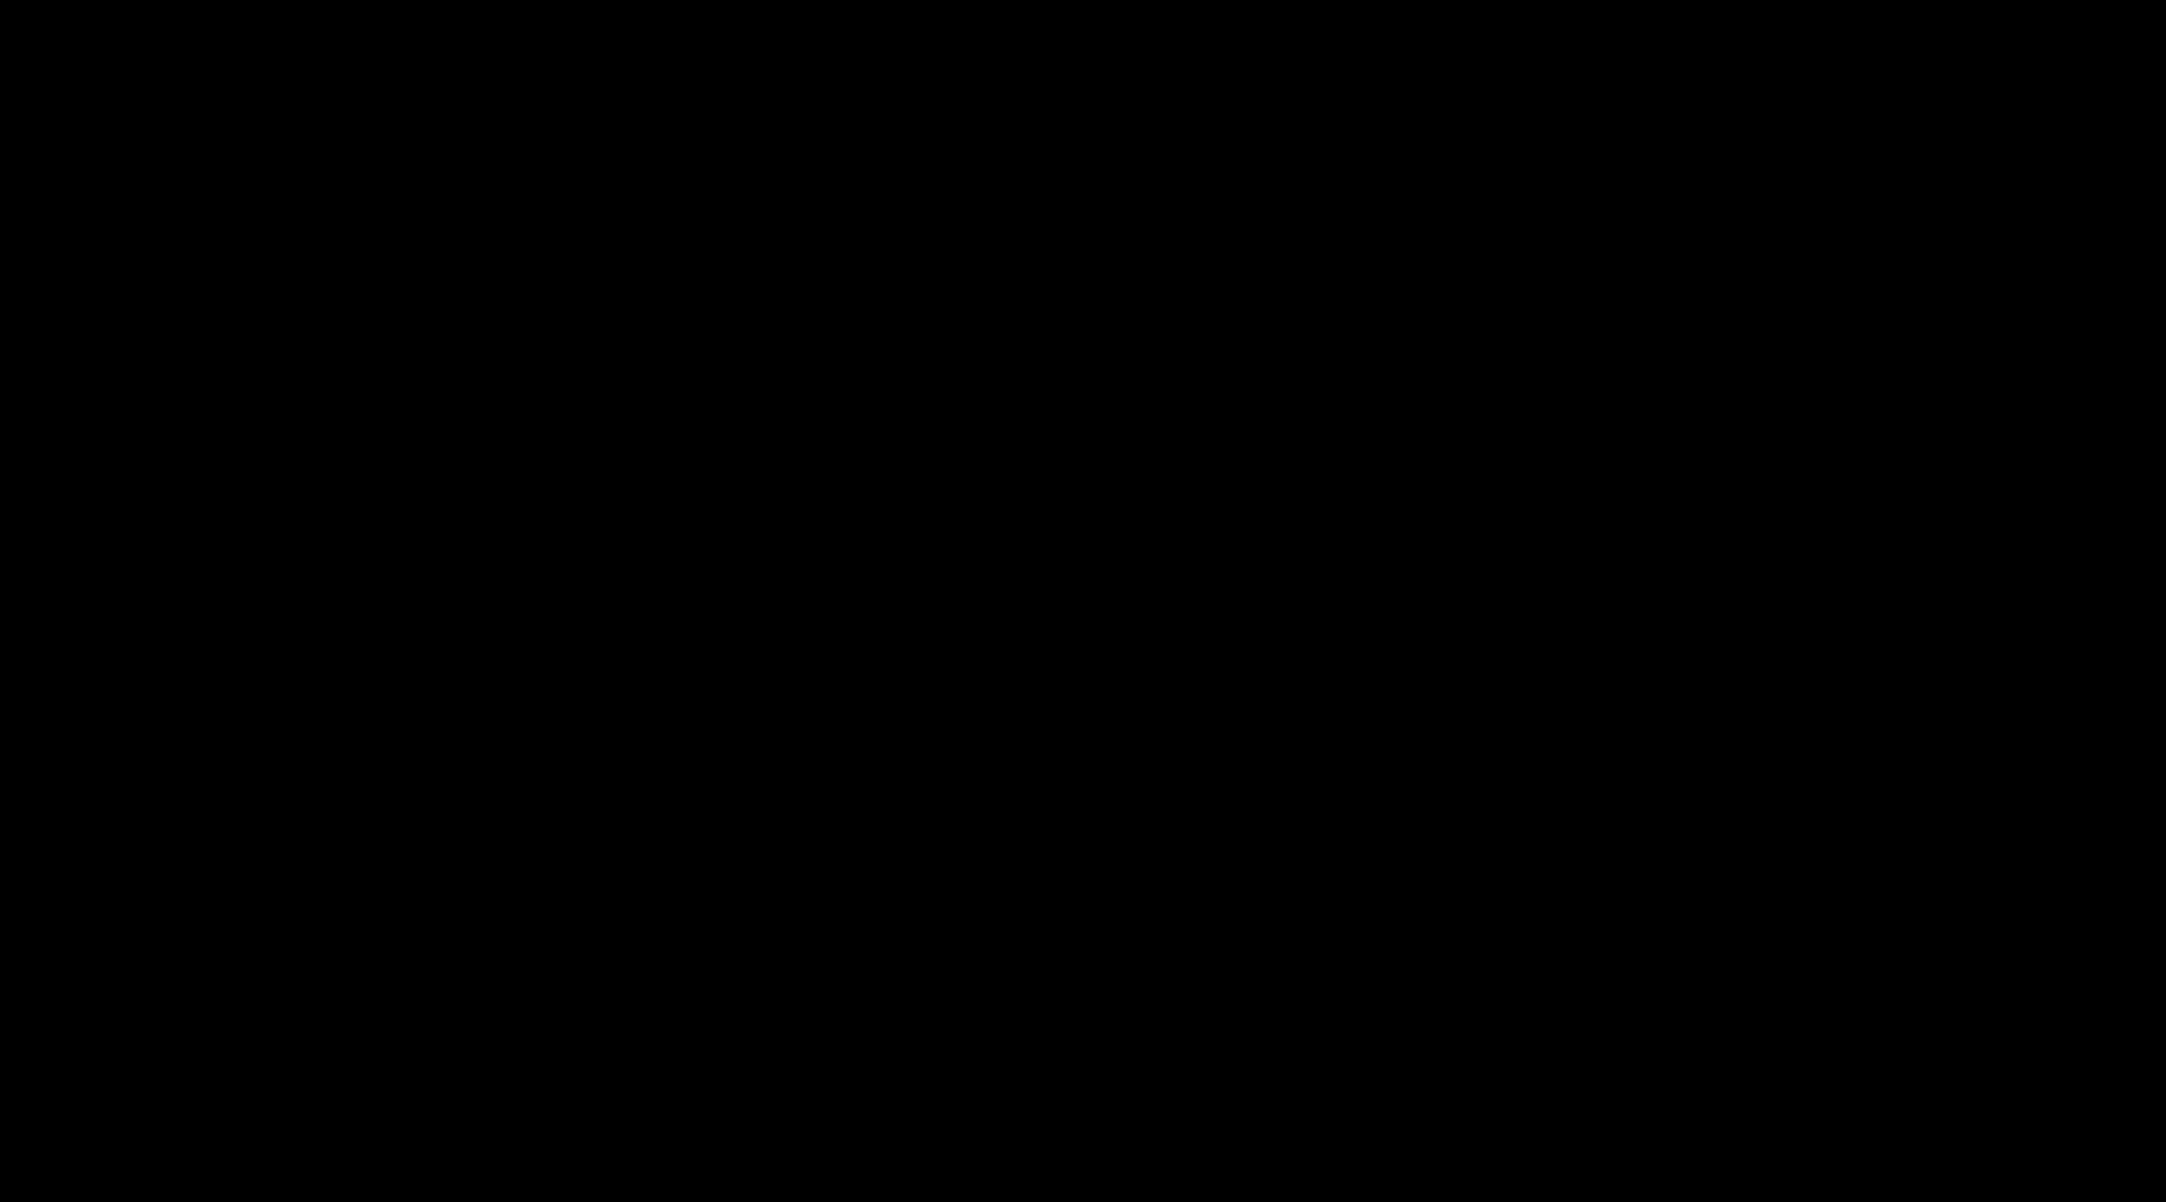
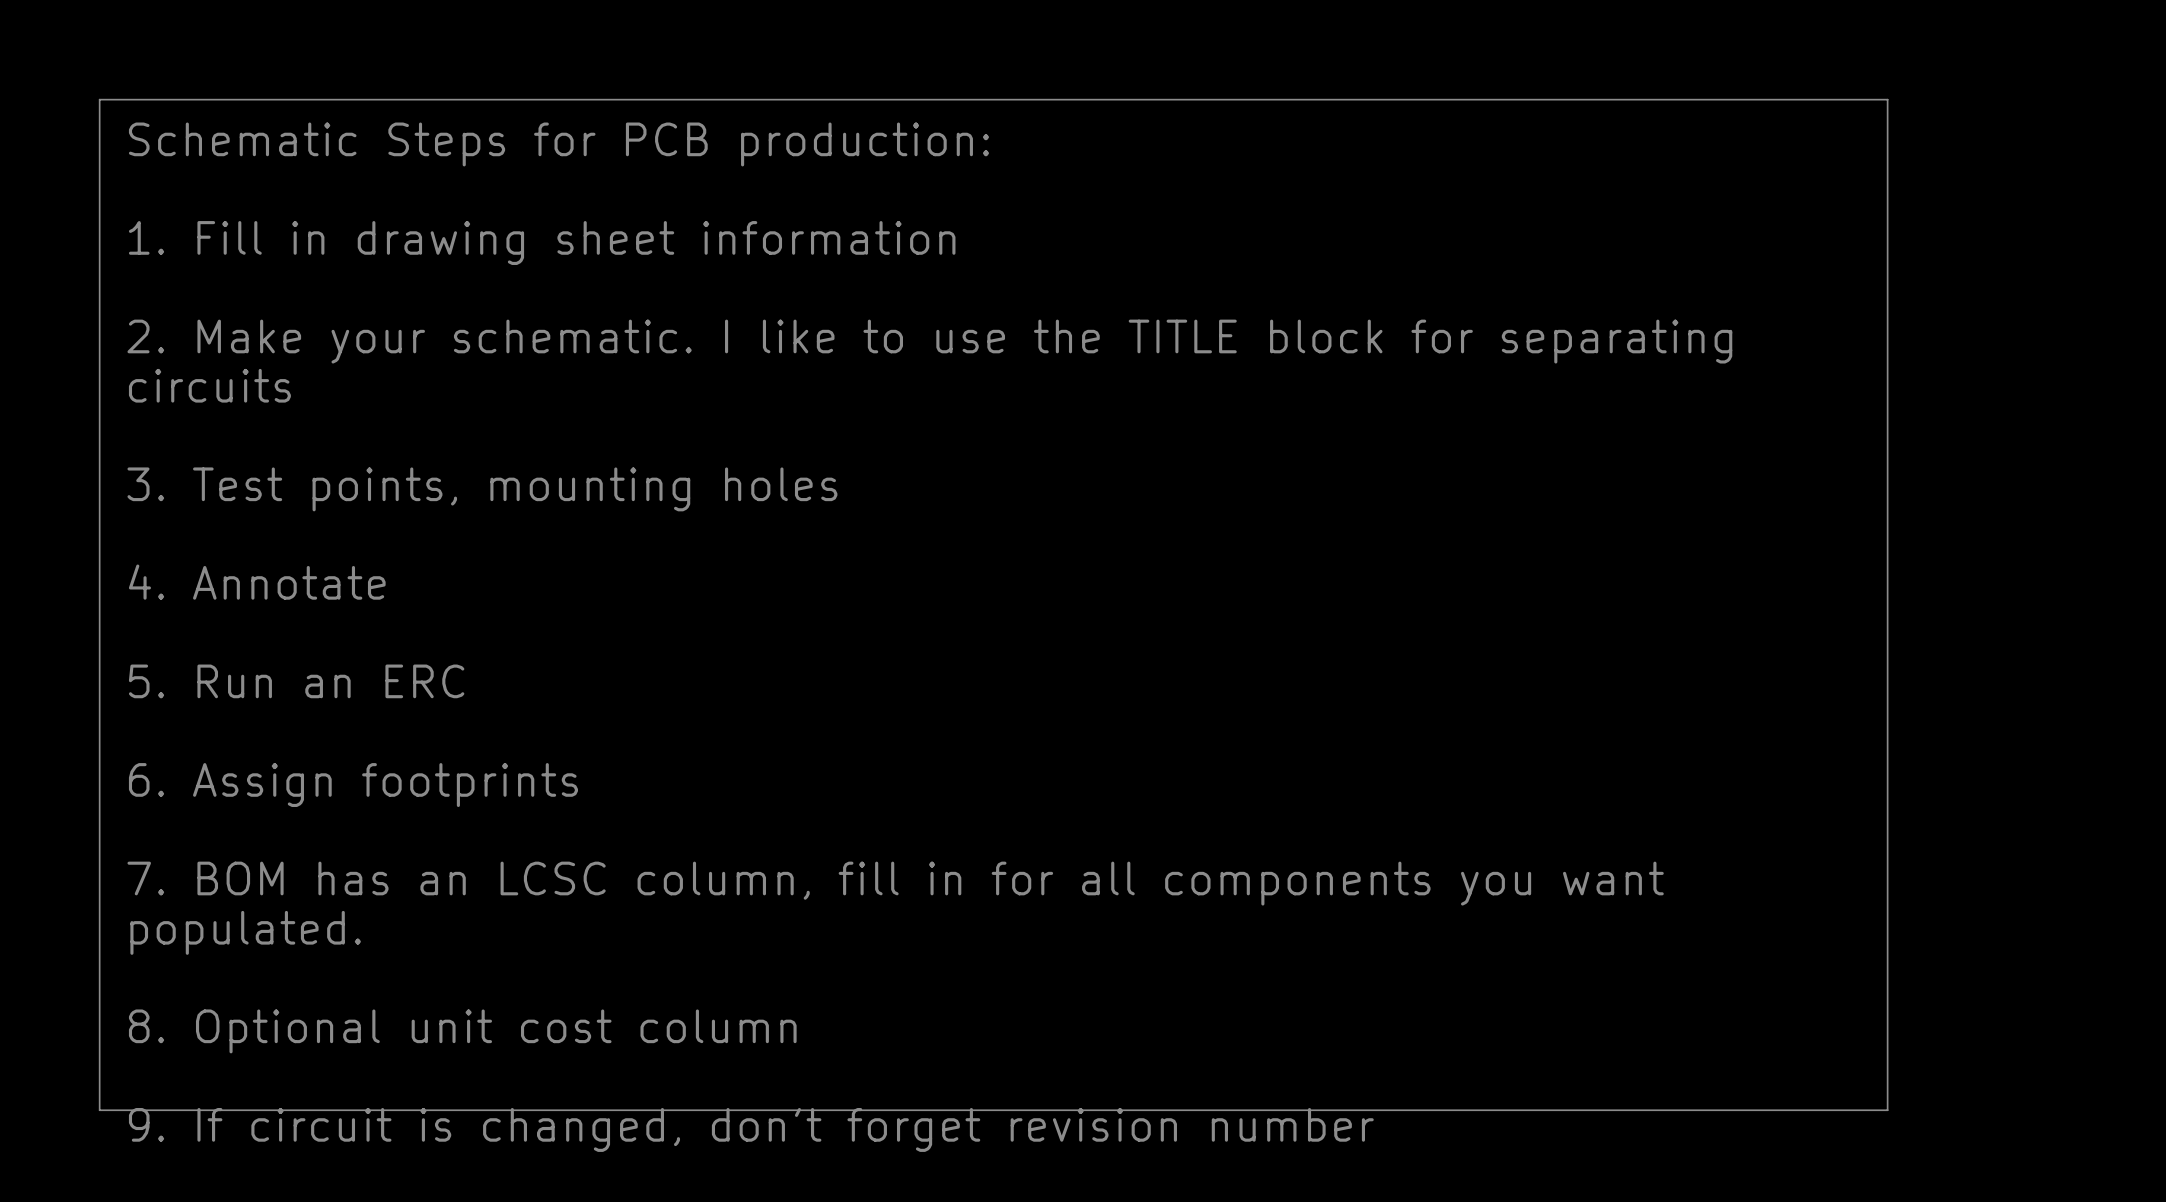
line: none -> (99, 99) (1887, 99) (1887, 1110) (99, 1110) (99, 99)
text: none -> Schematic Steps for PCB production: (558, 144)
text: none -> 1. Fill in drawing sheet information (542, 243)
text: none -> 2. Make your schematic. I like to use the TITLE block for separating (929, 341)
text: none -> circuits (209, 385)
text: none -> 3. Test points, mounting holes (482, 489)
text: none -> 4. Annotate (257, 582)
text: none -> 5. Run an ERC (296, 681)
text: none -> 6. Assign footprints (353, 785)
text: none -> 7. BOM has an LCSC column, fill in for all components you want (895, 883)
text: none -> populated. (245, 932)
text: none -> 8. Optional unit cost column (462, 1031)
text: none -> 9. If circuit is changed, don't forget revision number (751, 1129)

